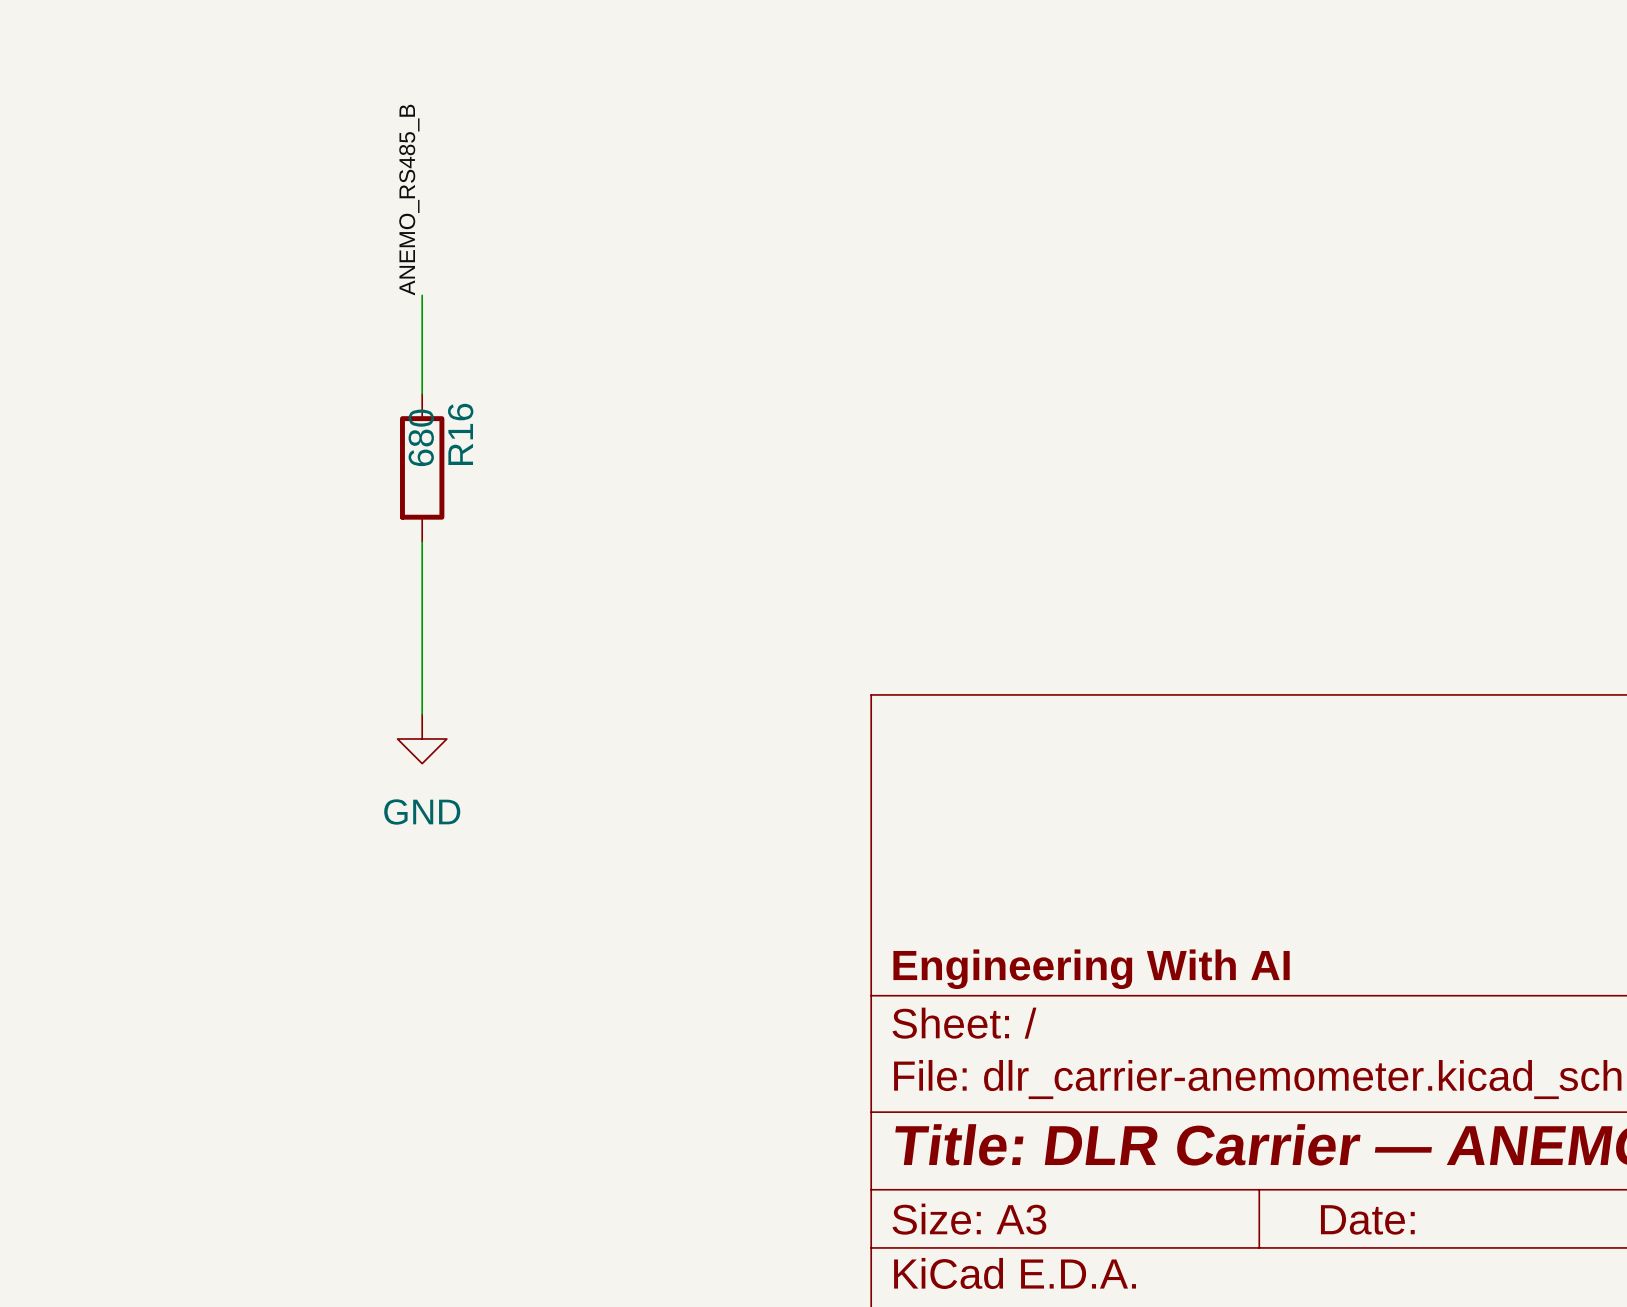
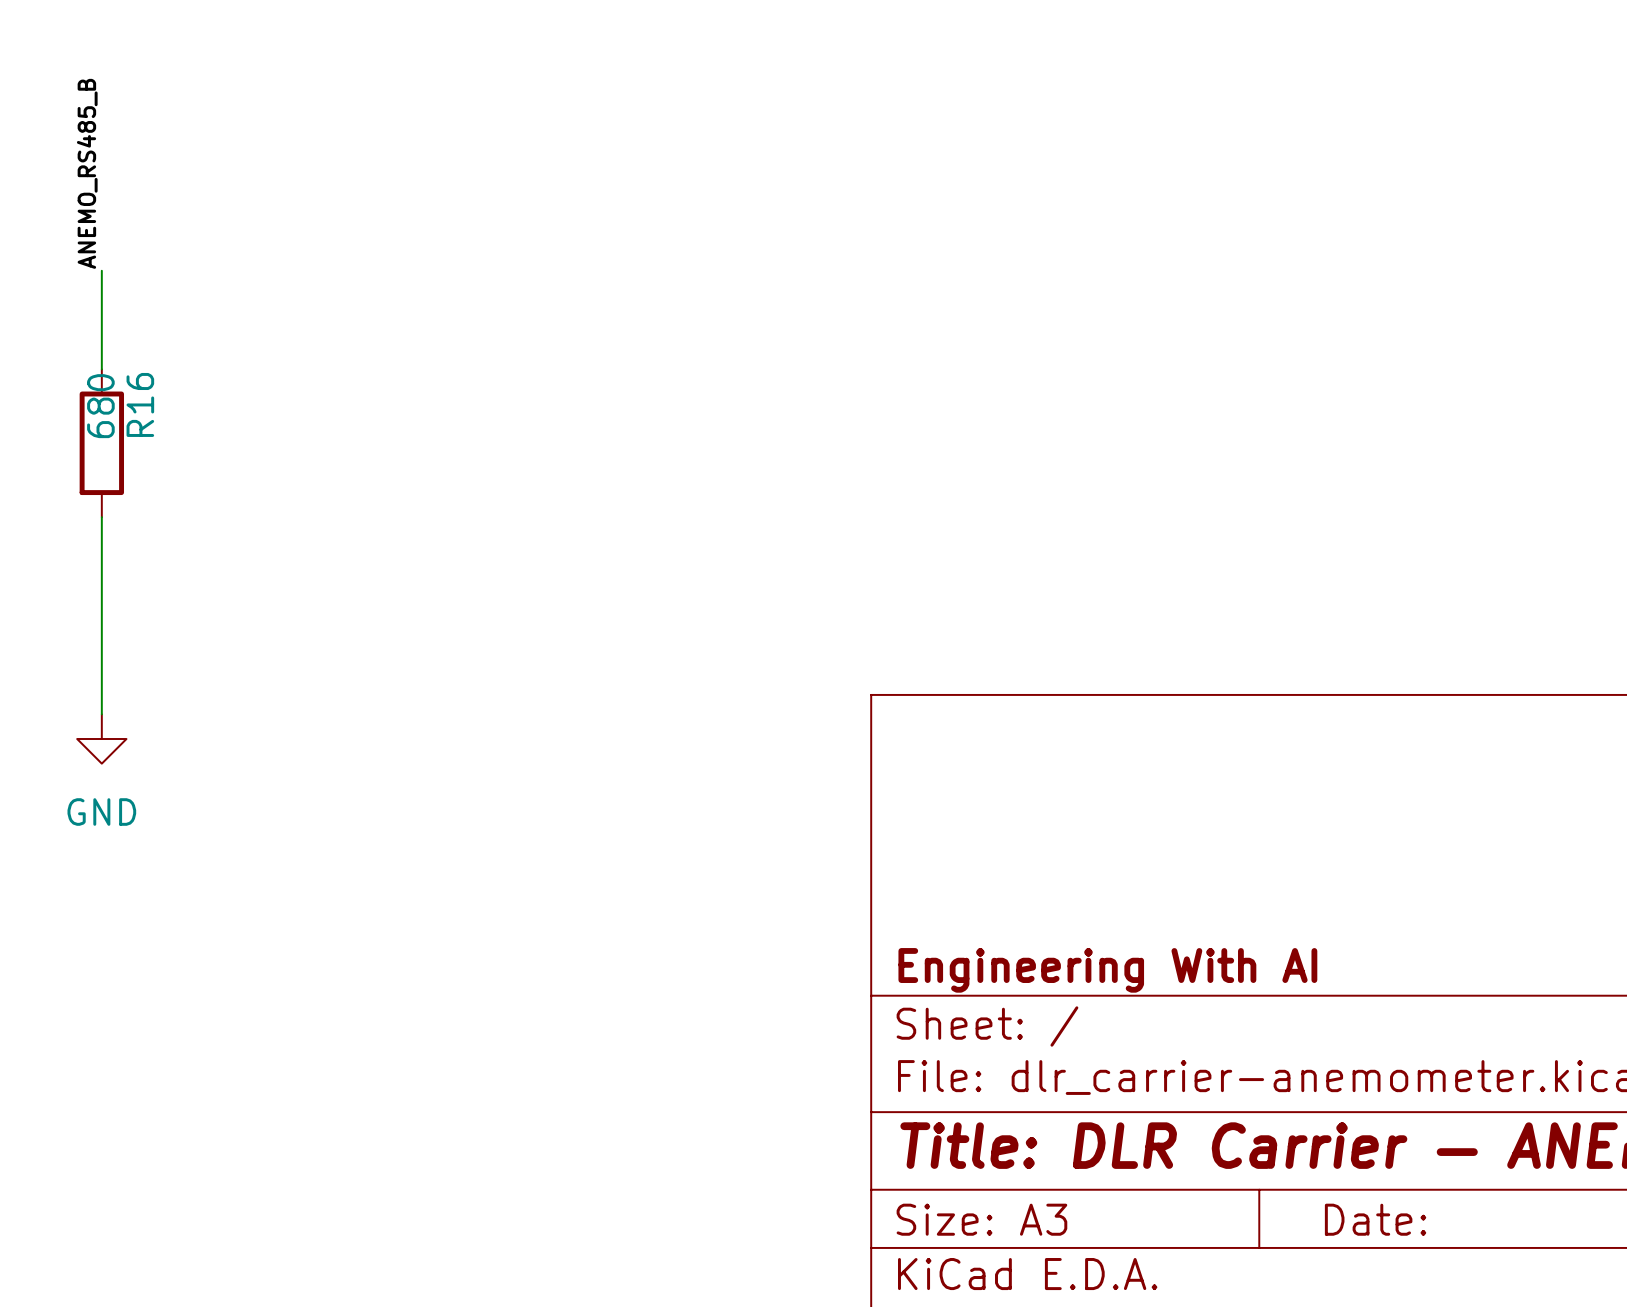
label position: ANEMO_RS485_B (409, 200) -> ANEMO_RS485_B (87, 173)
wire: (422, 295) (422, 393) -> (101, 270) (101, 369)
R16 position: (422, 467) -> (101, 443)
wire: none -> (101, 517) (101, 714)
wire: (422, 541) (422, 714) -> none
power symbol position: GND (422, 738) -> GND (101, 738)

